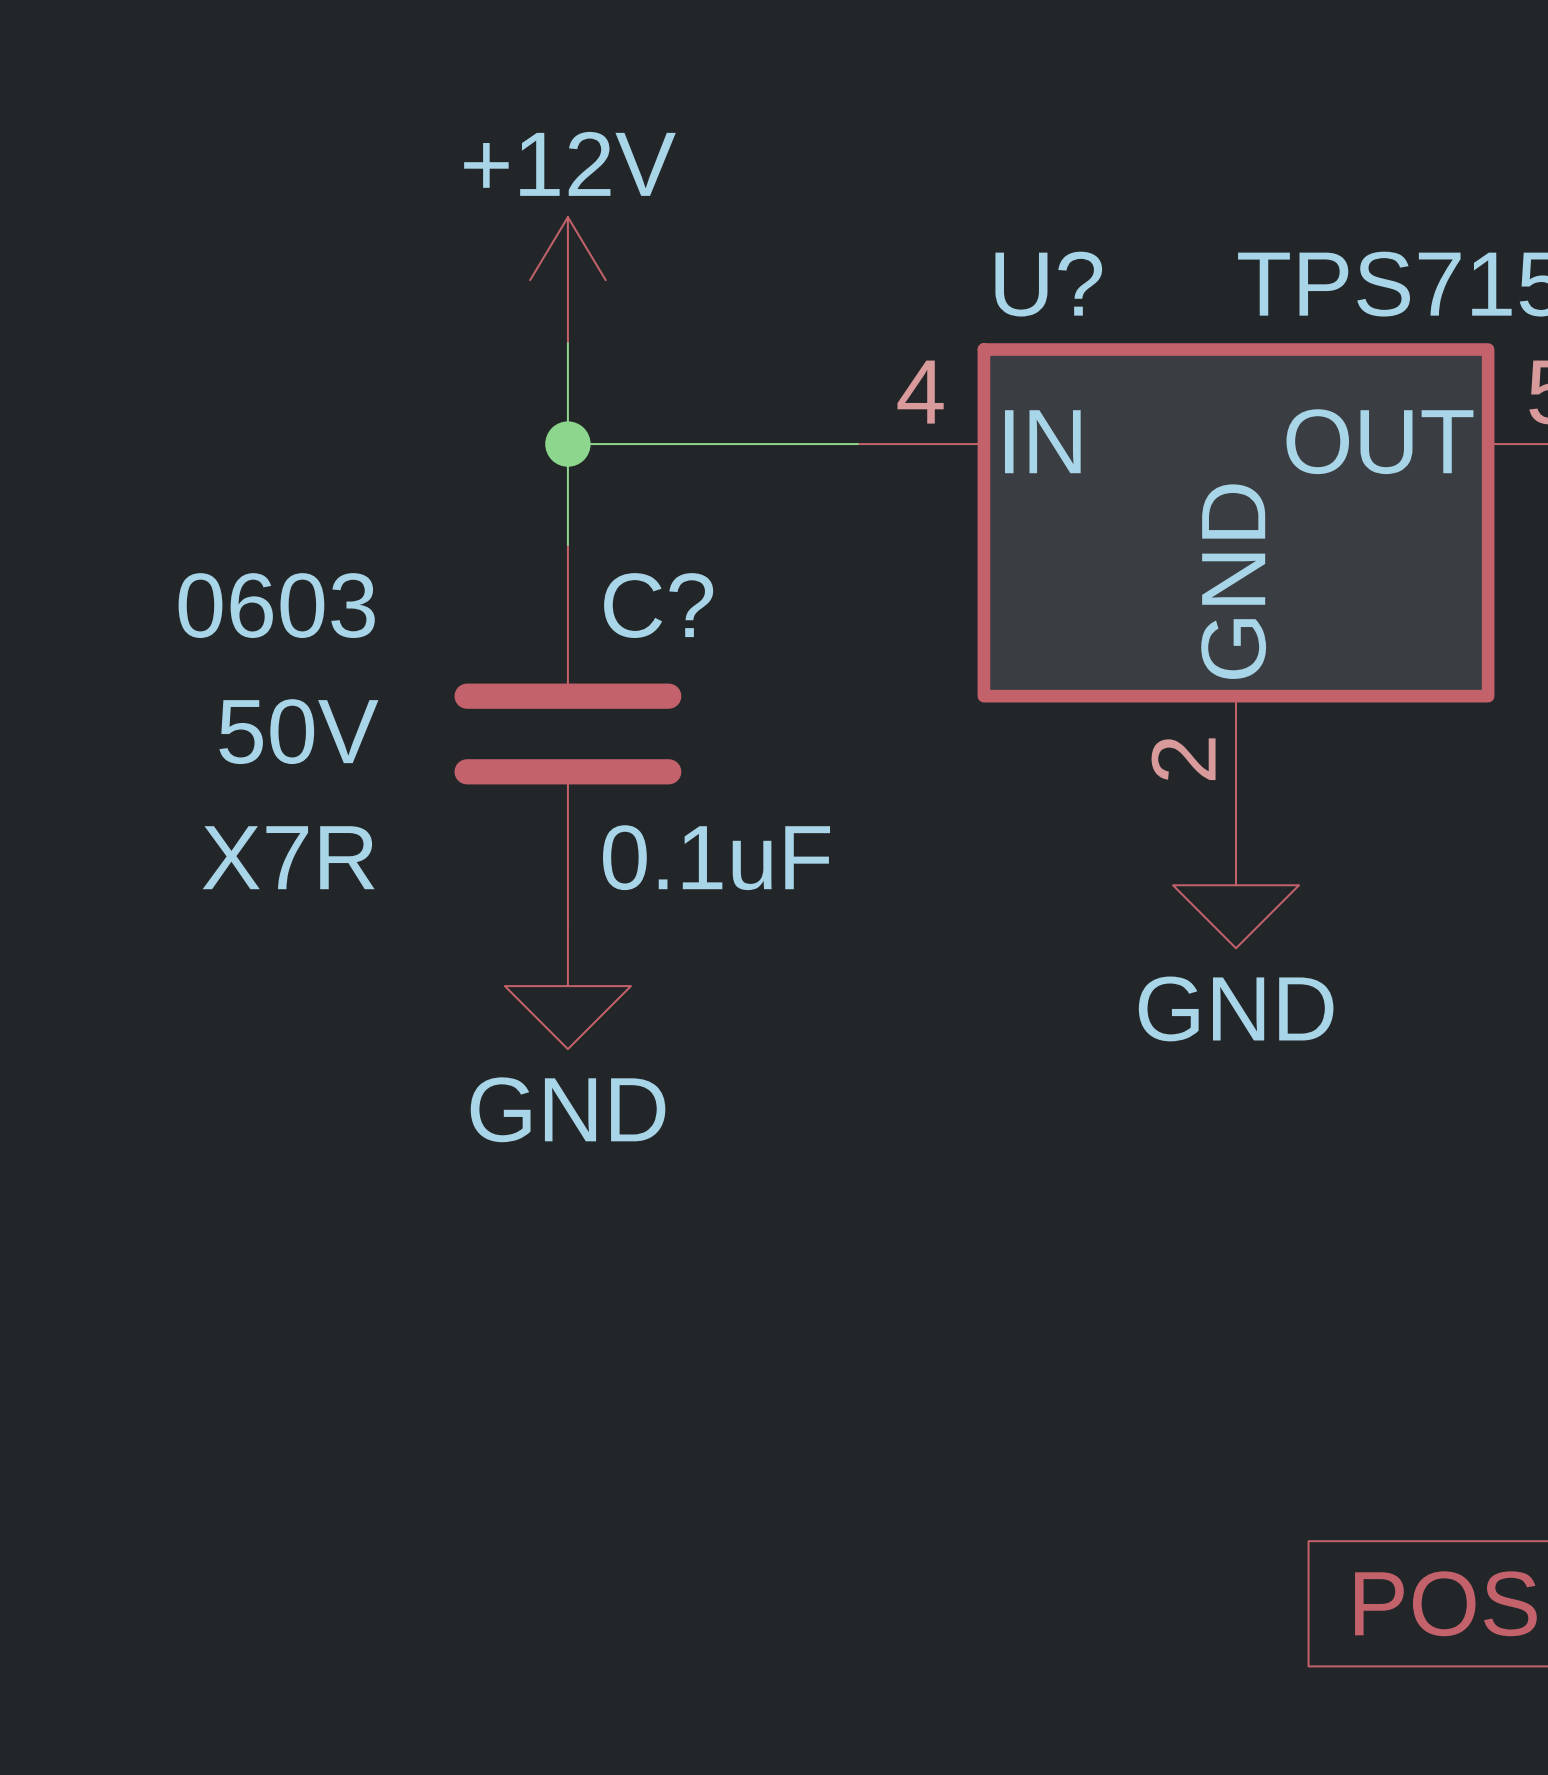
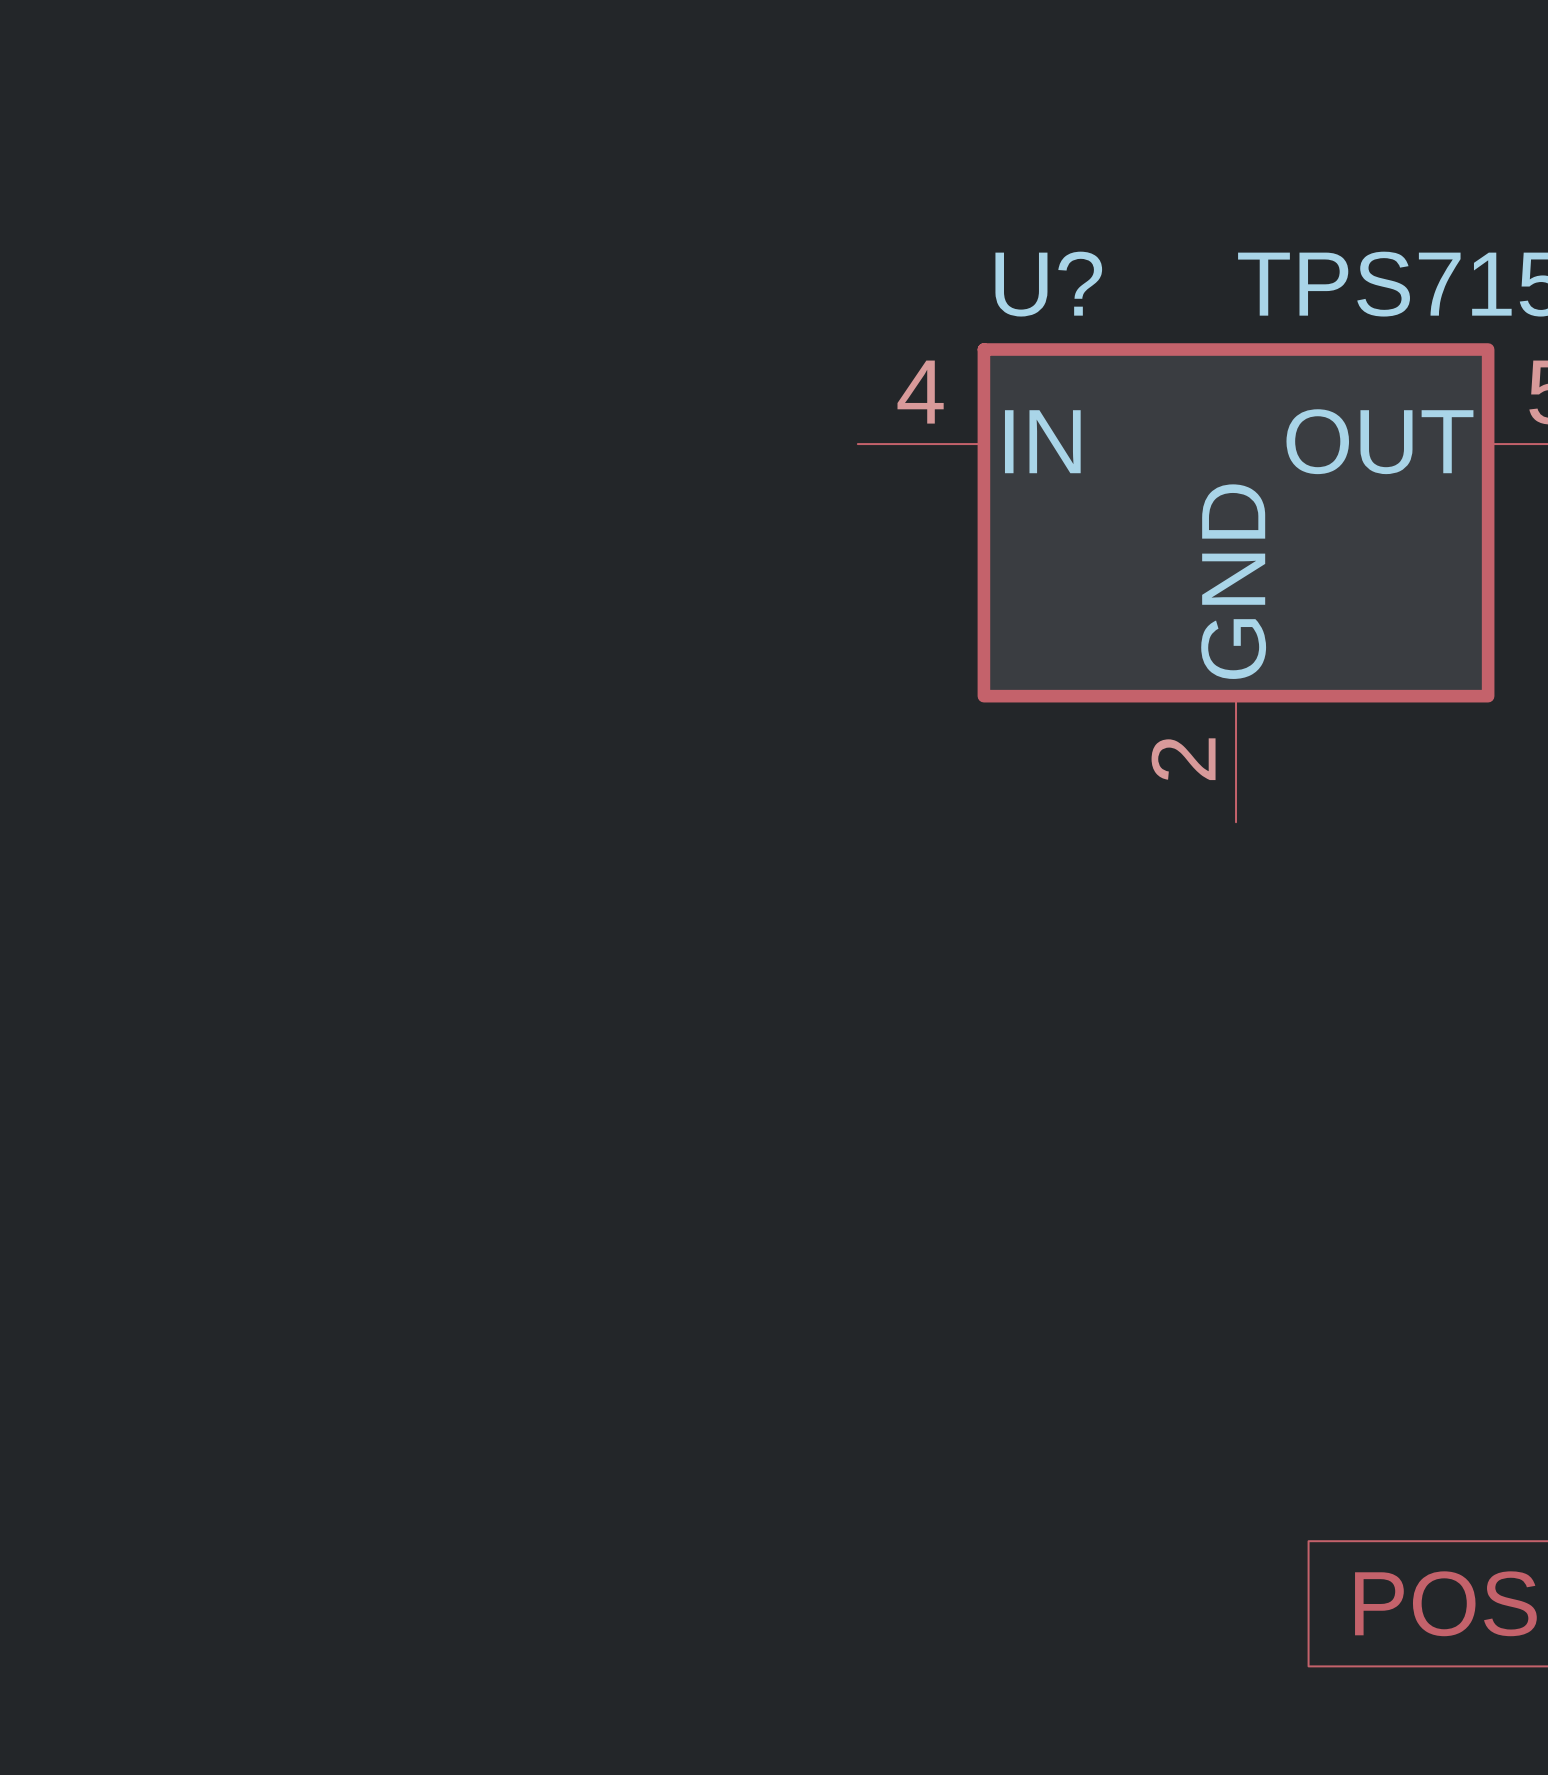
power symbol: +12V (567, 280) -> none
wire: (567, 343) (567, 544) -> none
wire: (567, 444) (857, 444) -> none
junction: (567, 444) -> none
C?: 0.1uF (567, 733) -> none
power symbol: GND (1236, 885) -> none
power symbol: GND (567, 986) -> none

